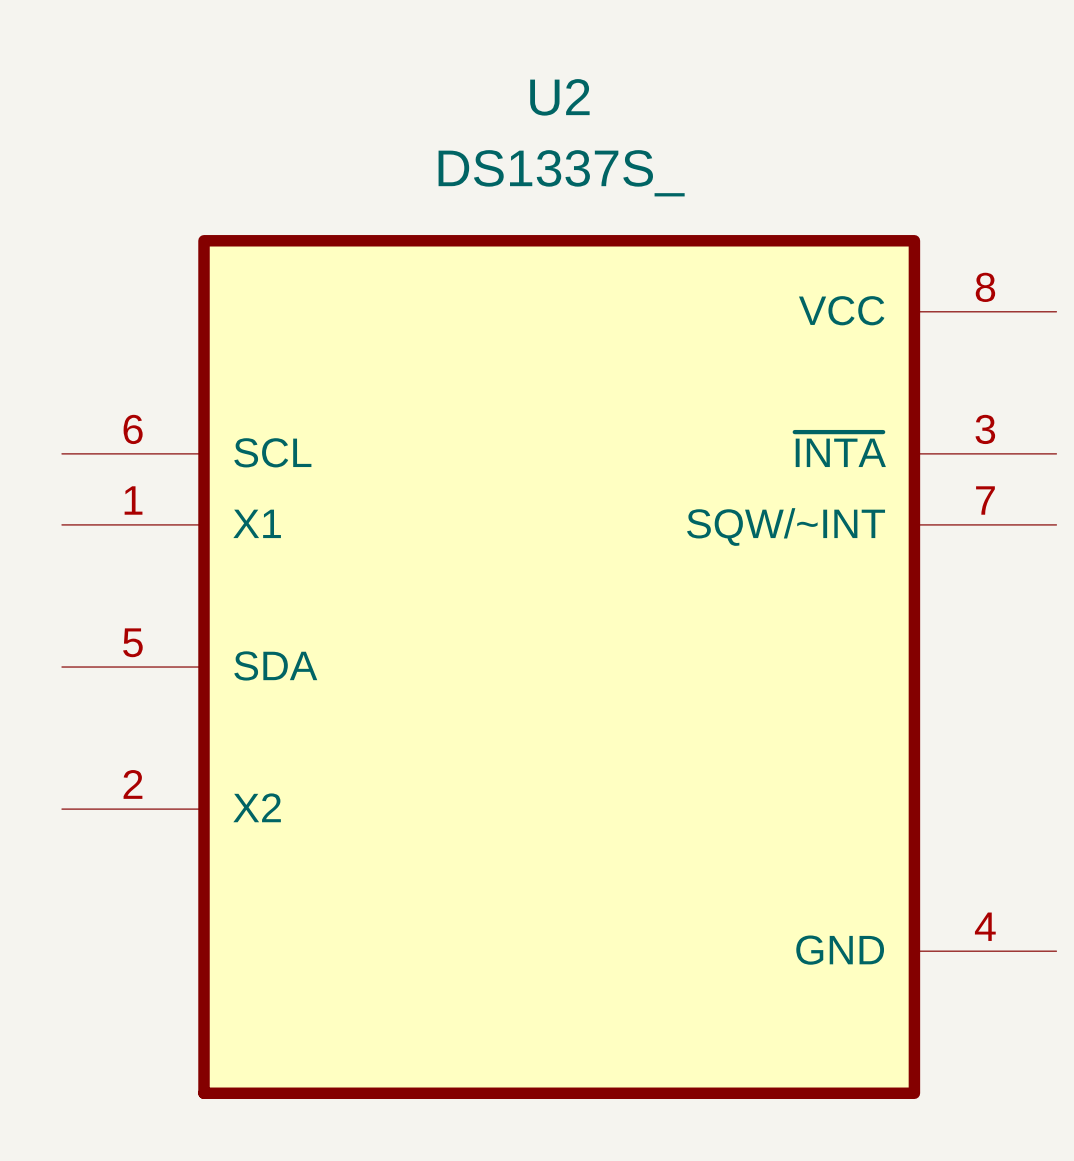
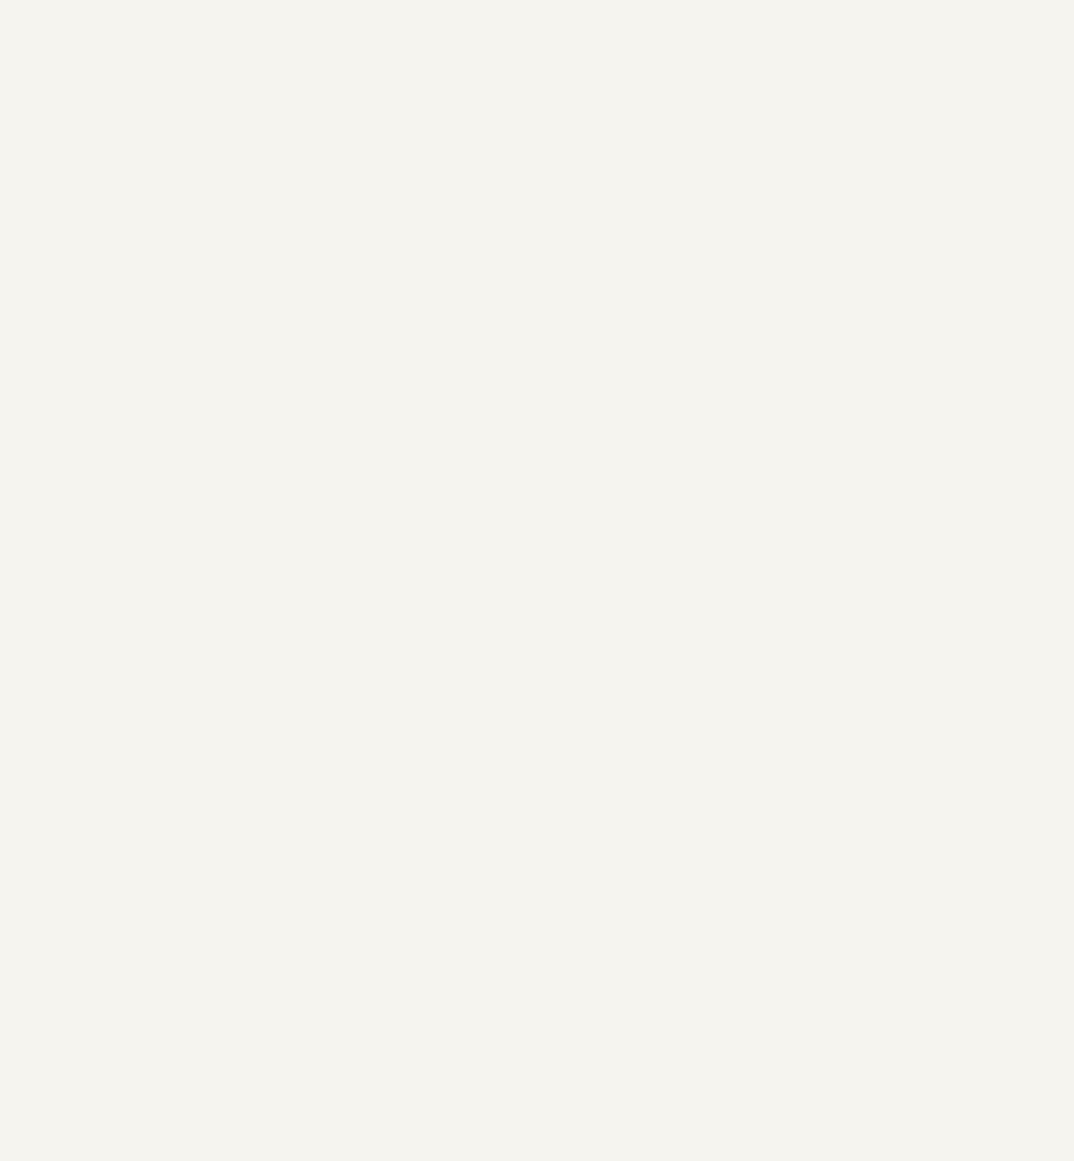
U2: DS1337S_ (559, 667) -> none

